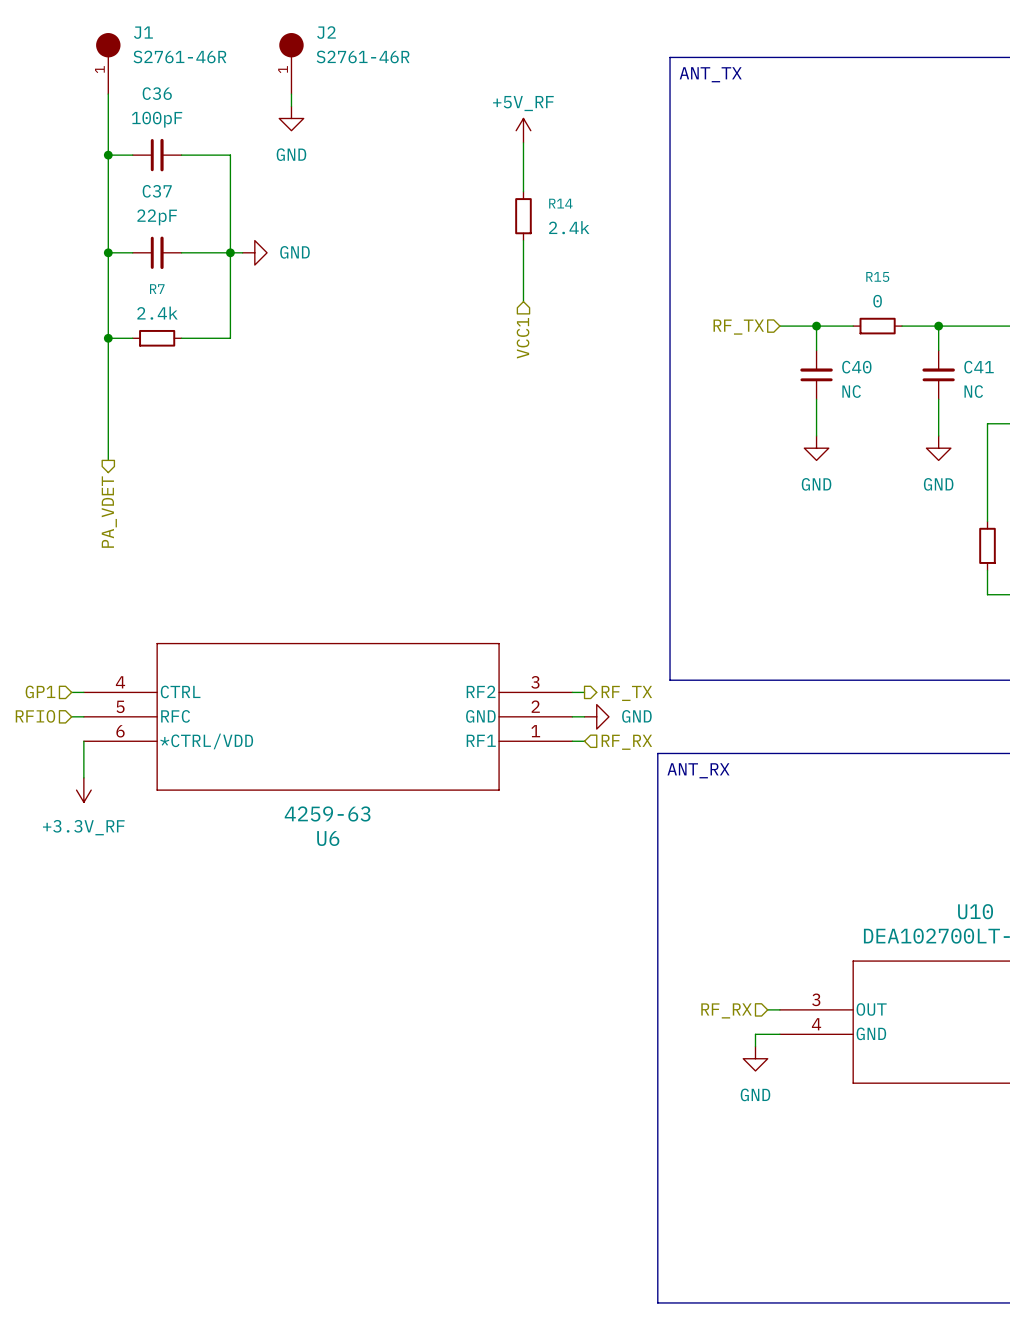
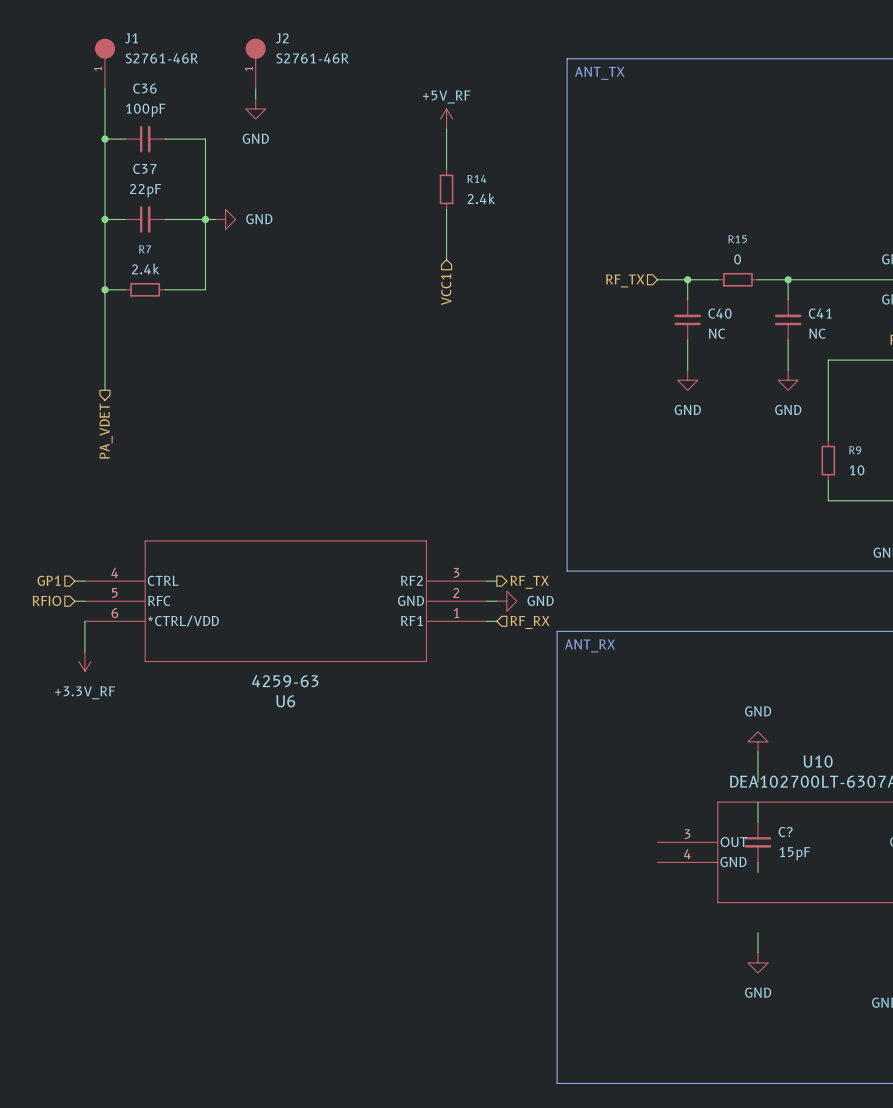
power symbol: none -> GND (758, 741)
wire: none -> (758, 751) (758, 782)
wire: none -> (758, 802) (758, 822)
wire: (767, 1009) (779, 1009) -> none
C?: none -> 15pF (758, 842)
hierarchical label: RF_RX (726, 1010) -> none
wire: (779, 1034) (755, 1034) (755, 1046) -> none
wire: none -> (758, 862) (758, 872)
power symbol: GND (755, 1058) -> none
wire: none -> (758, 932) (758, 952)
power symbol: none -> GND (758, 962)

